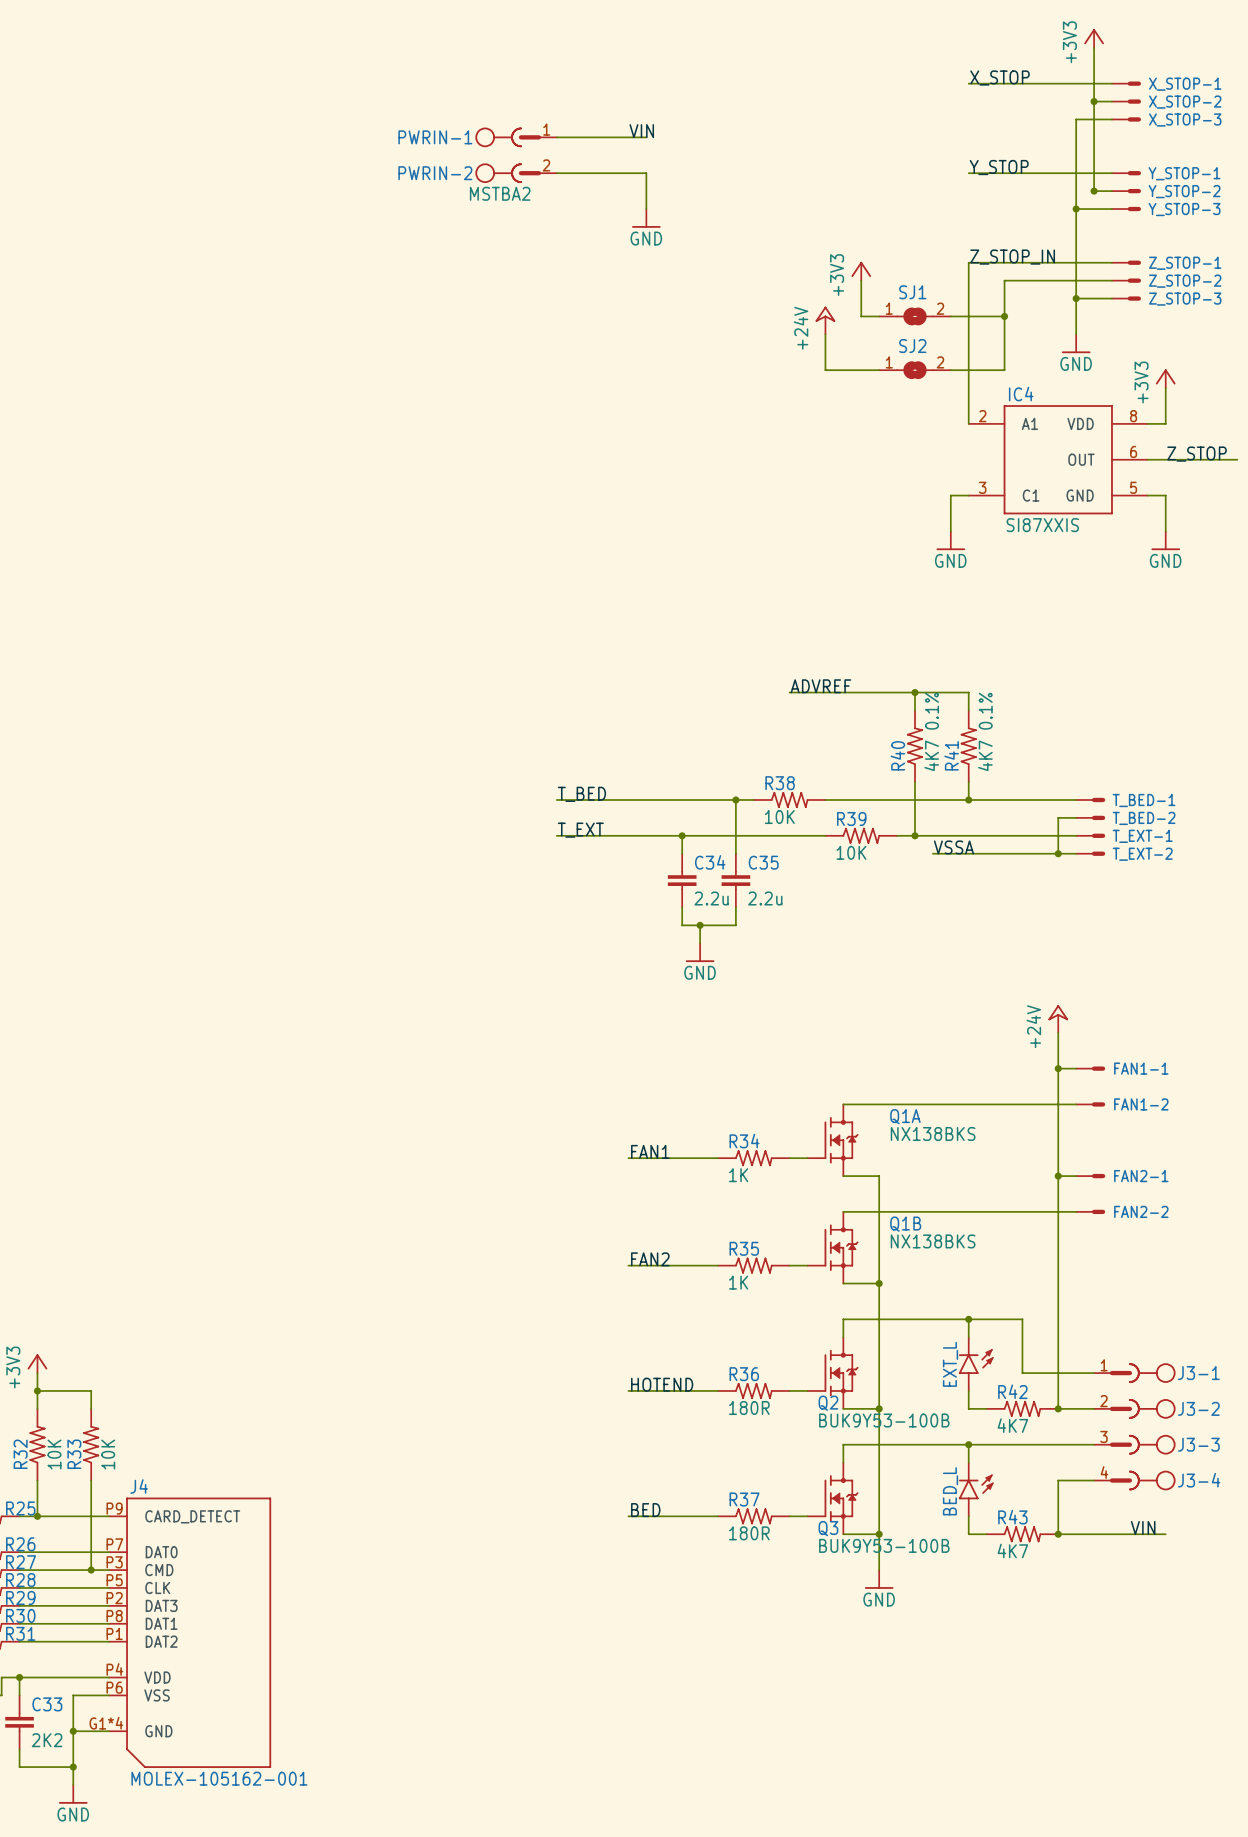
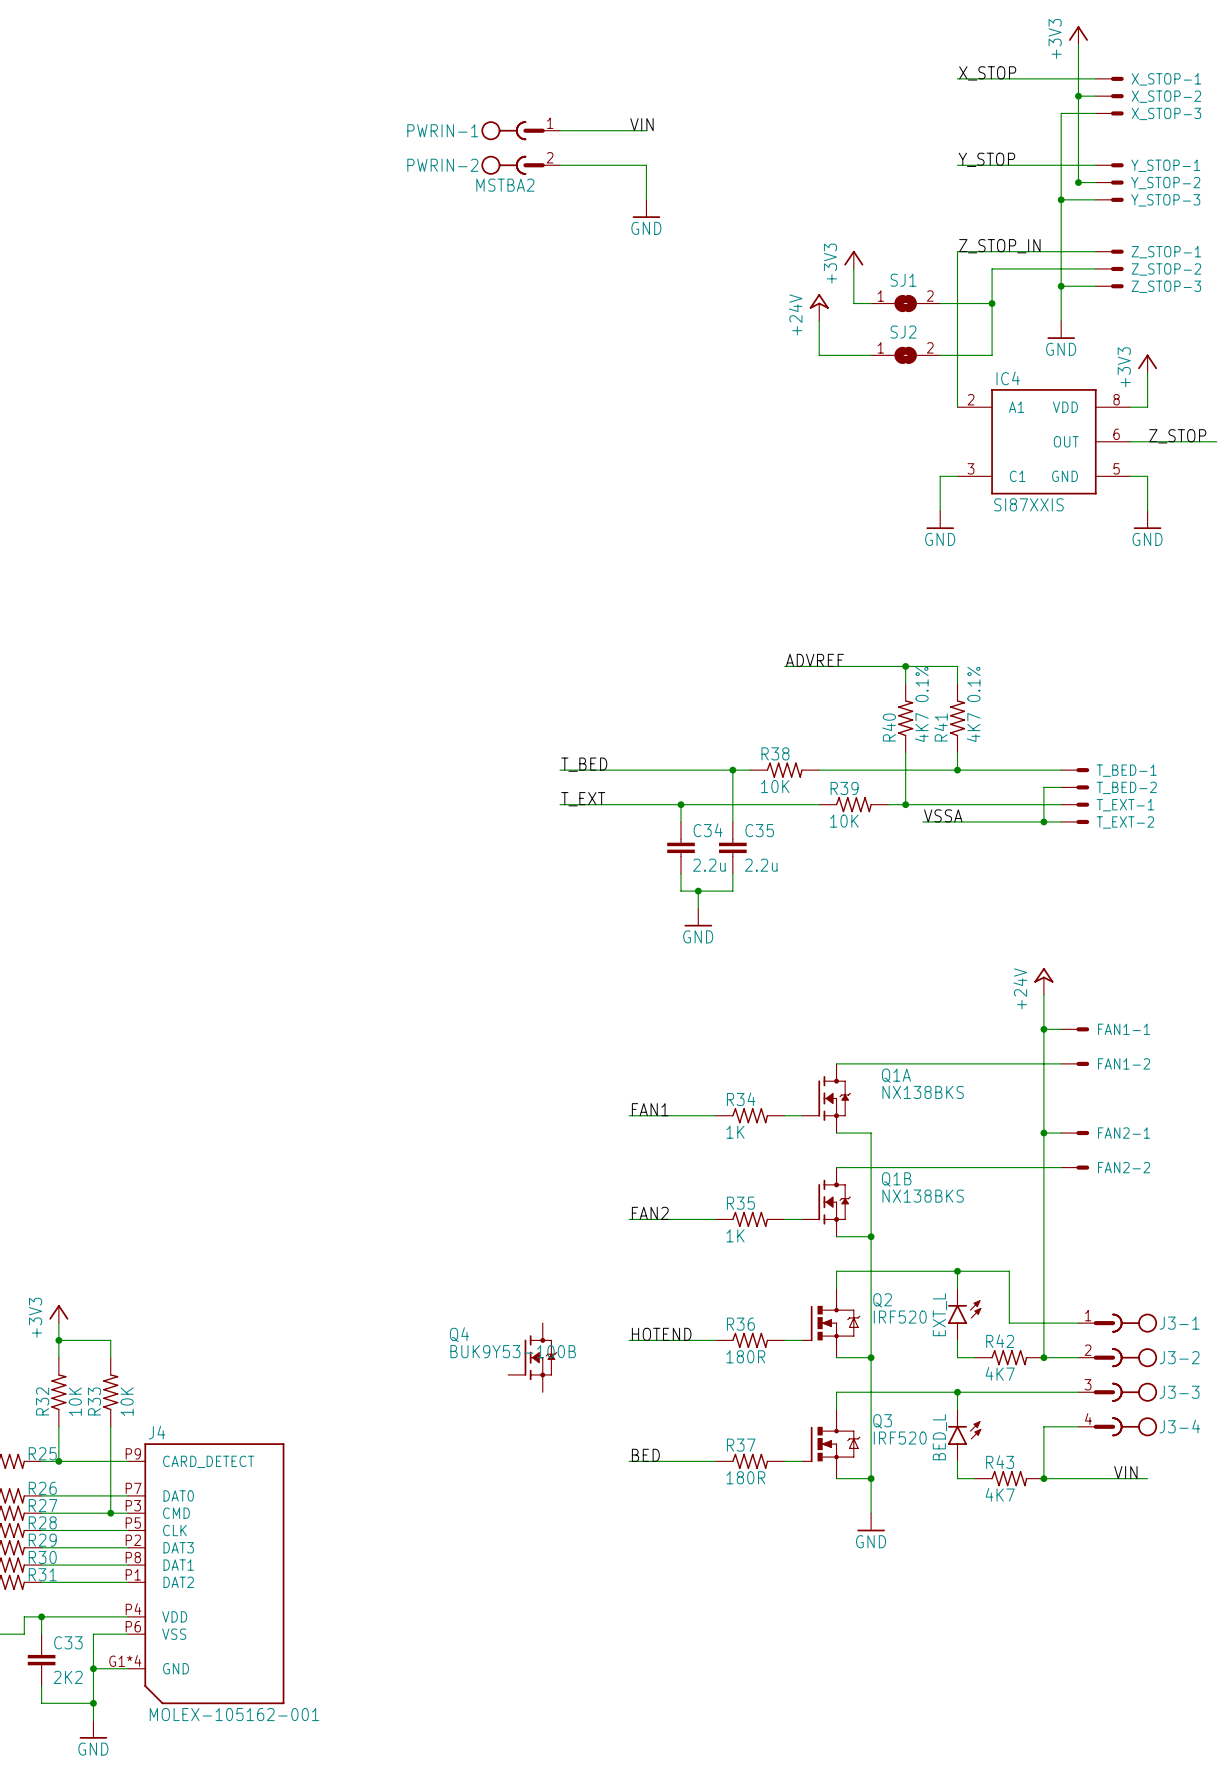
Q2 symbol: [807, 1337, 859, 1409] -> [801, 1288, 861, 1358]
Q2 name position: Q2 (828, 1403) -> Q2 (882, 1300)
Q4: none -> BUK9Y53-100B (532, 1357)
Q2 value: BUK9Y53-100B (884, 1420) -> IRF520 (900, 1317)
Q3 symbol: [807, 1462, 859, 1535] -> [801, 1409, 861, 1479]
Q3 name position: Q3 (828, 1528) -> Q3 (882, 1421)
Q3 value: BUK9Y53-100B (884, 1545) -> IRF520 (900, 1438)

